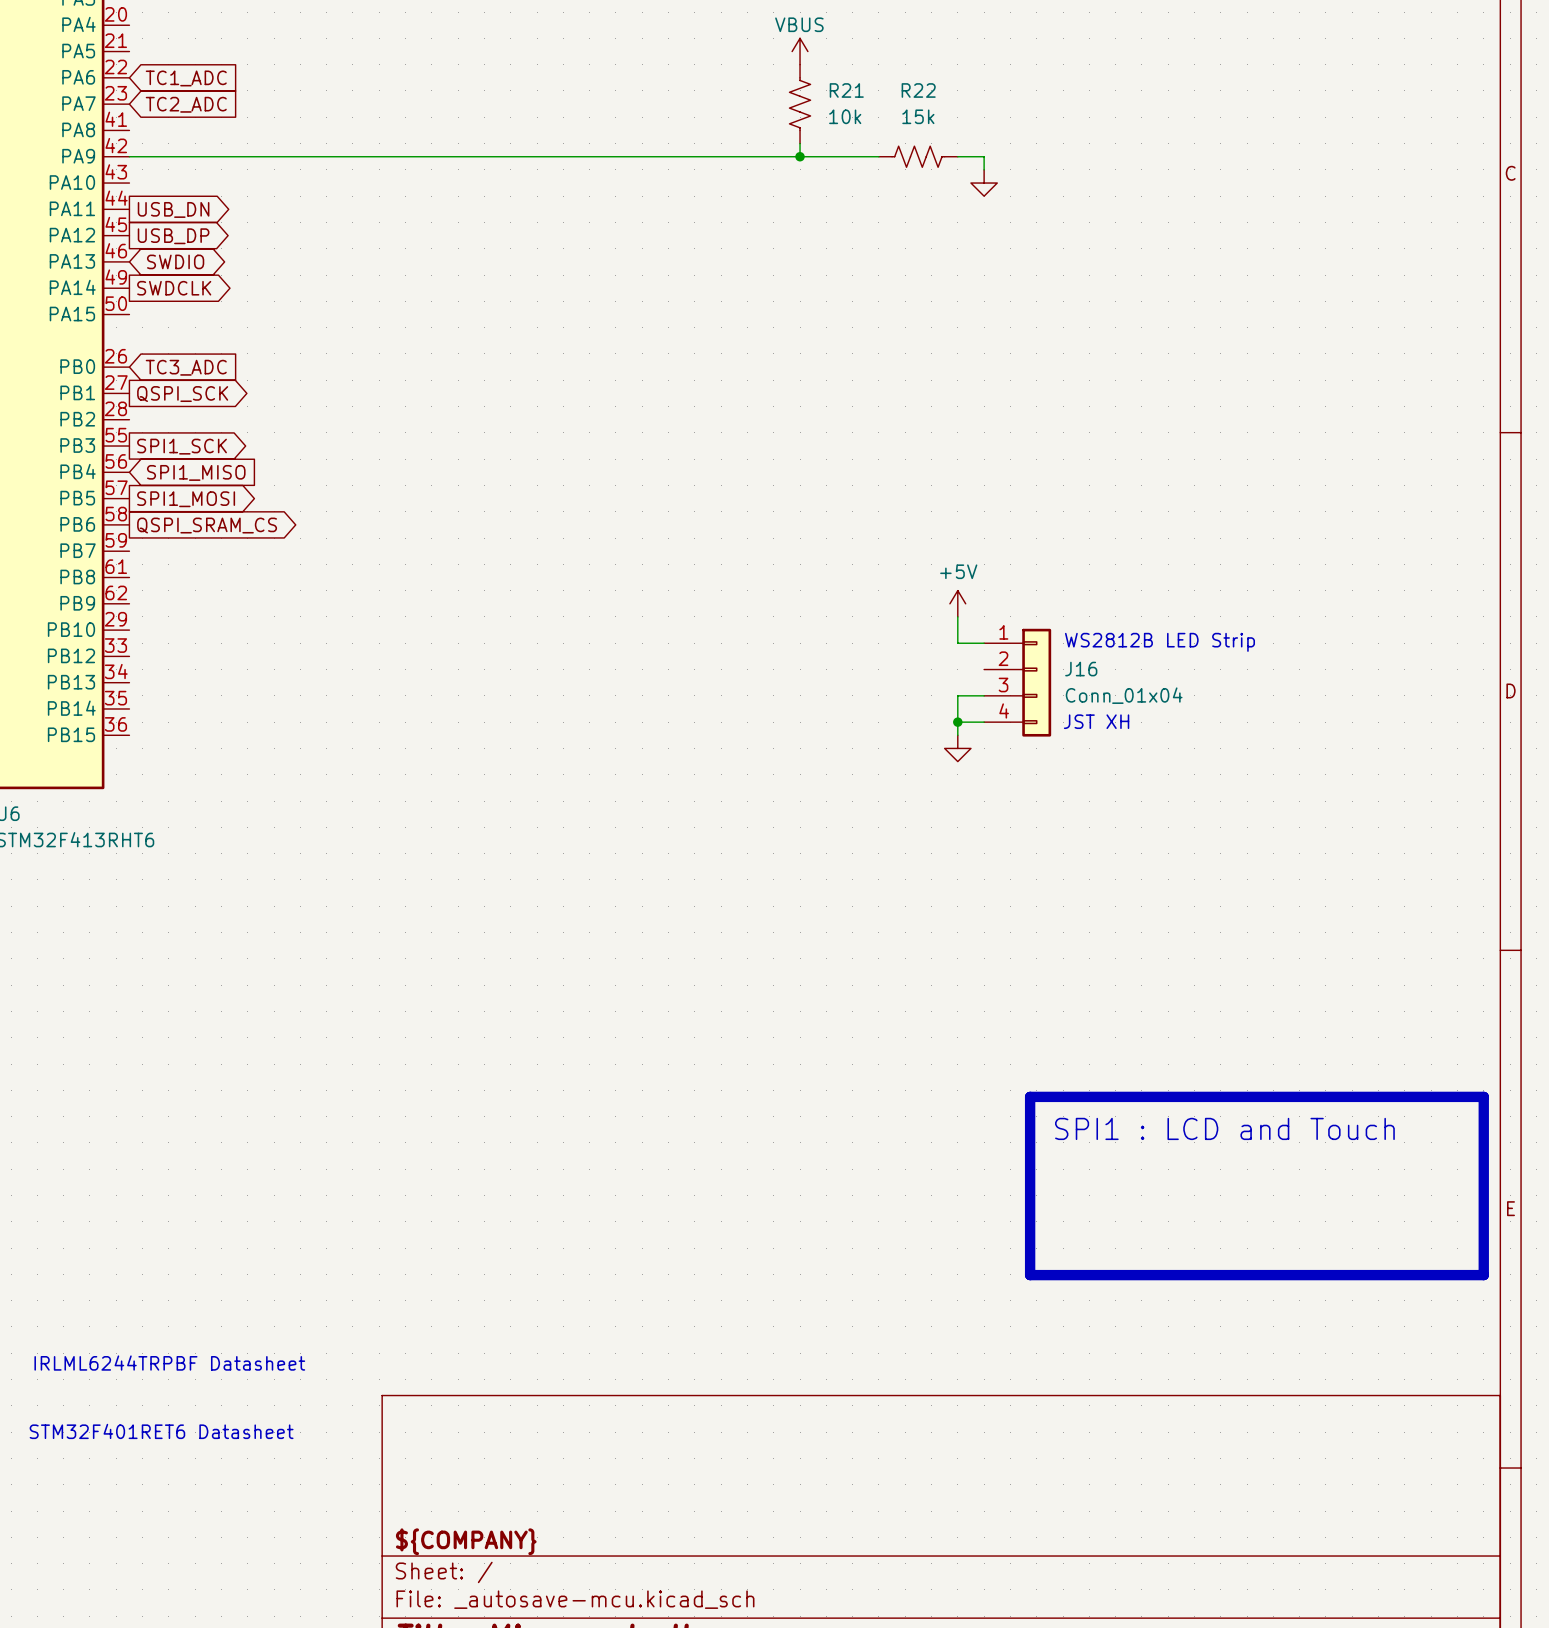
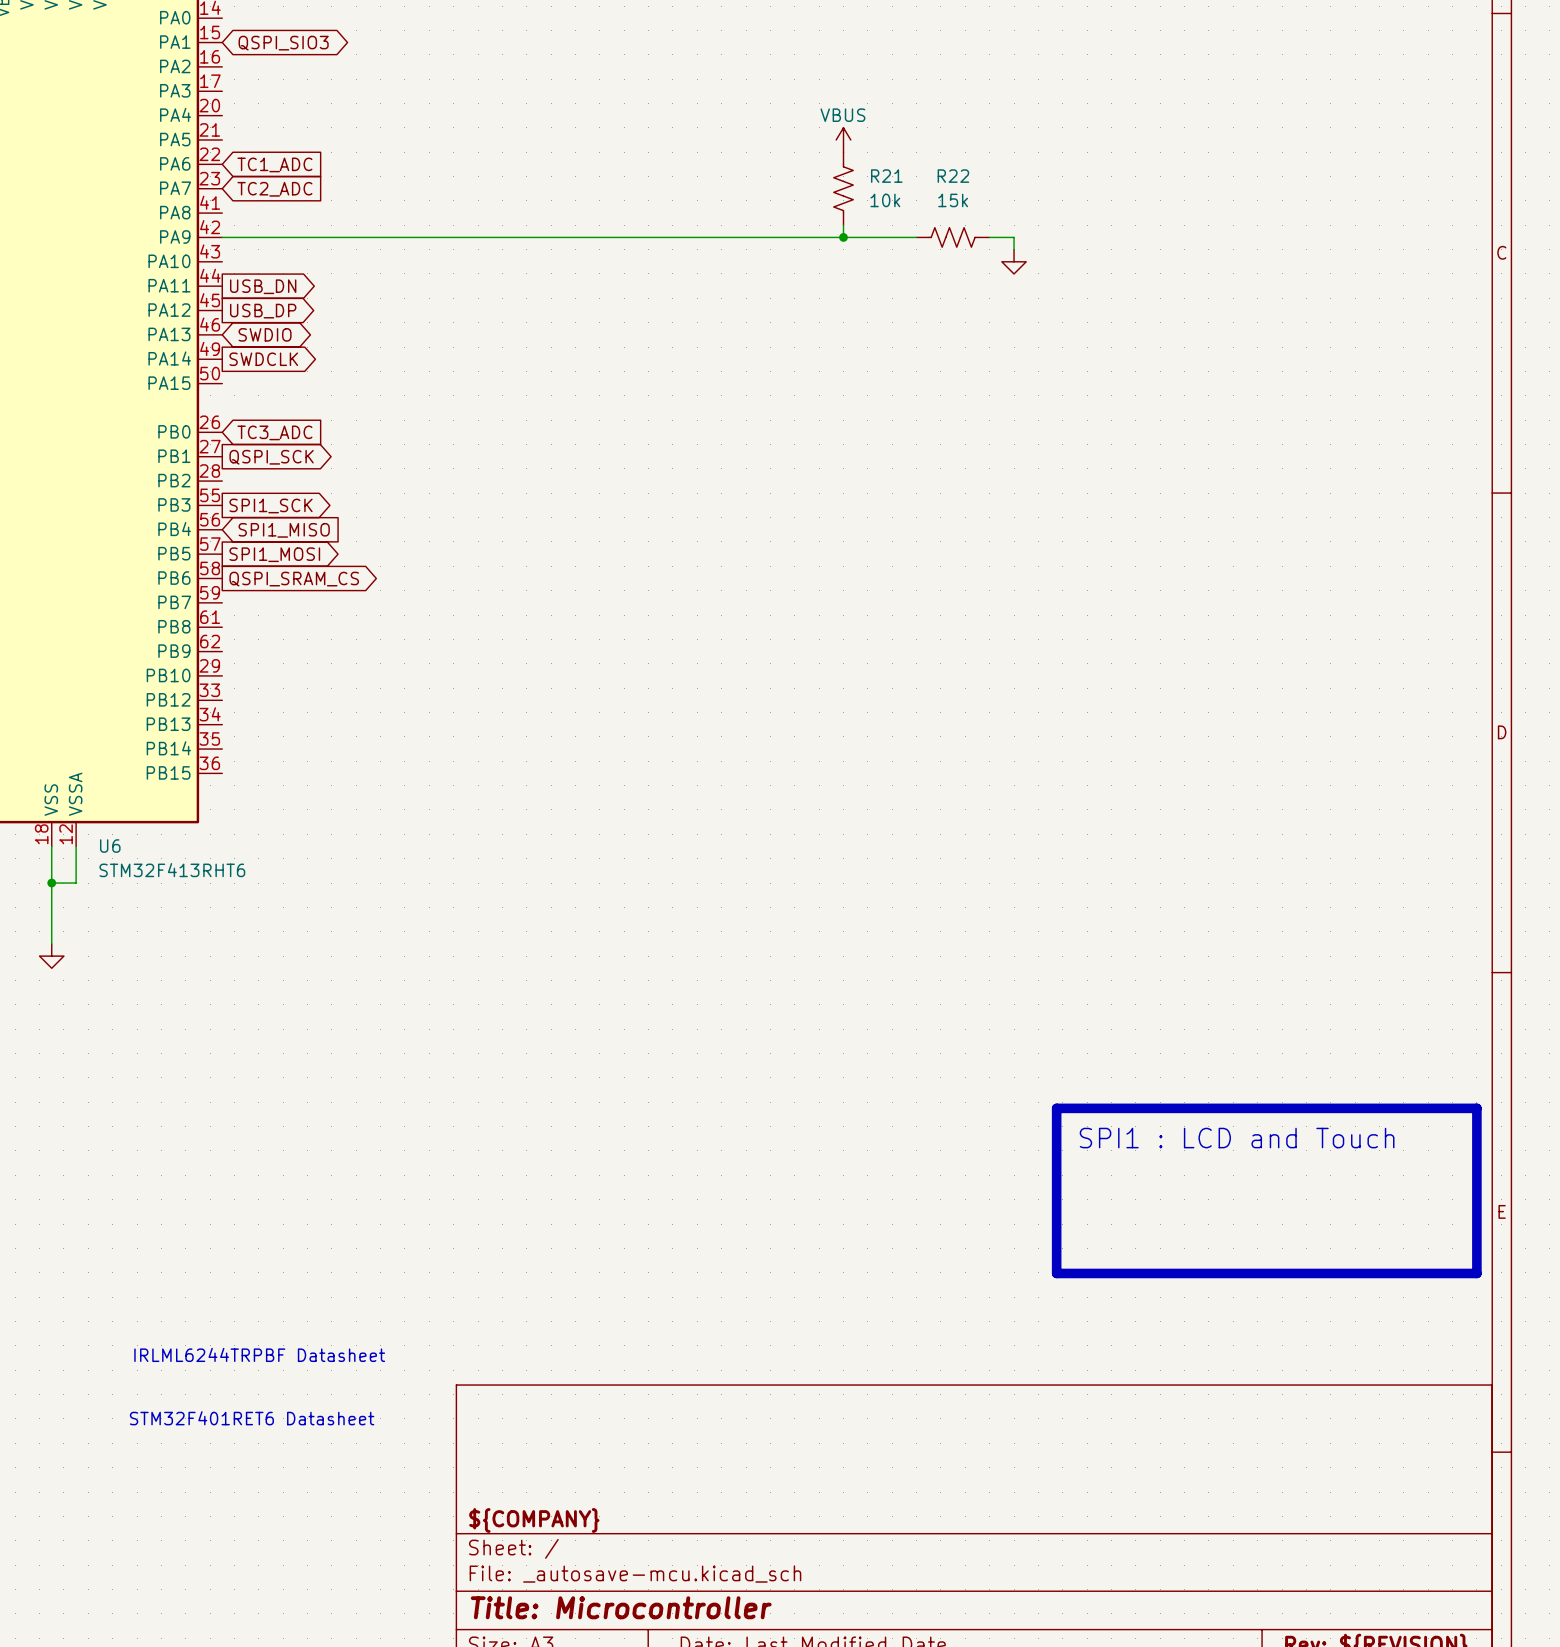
power symbol: +5V (957, 603) -> none
wire: (957, 616) (957, 643) (984, 643) -> none
text: WS2812B LED Strip (1159, 642) -> none
J16: Conn_01x04 (1017, 682) -> none
wire: (984, 695) (957, 695) (957, 735) -> none
text: JST XH (1096, 721) -> none
wire: (957, 722) (984, 722) -> none
junction: (957, 722) -> none
power symbol: (957, 748) -> none

